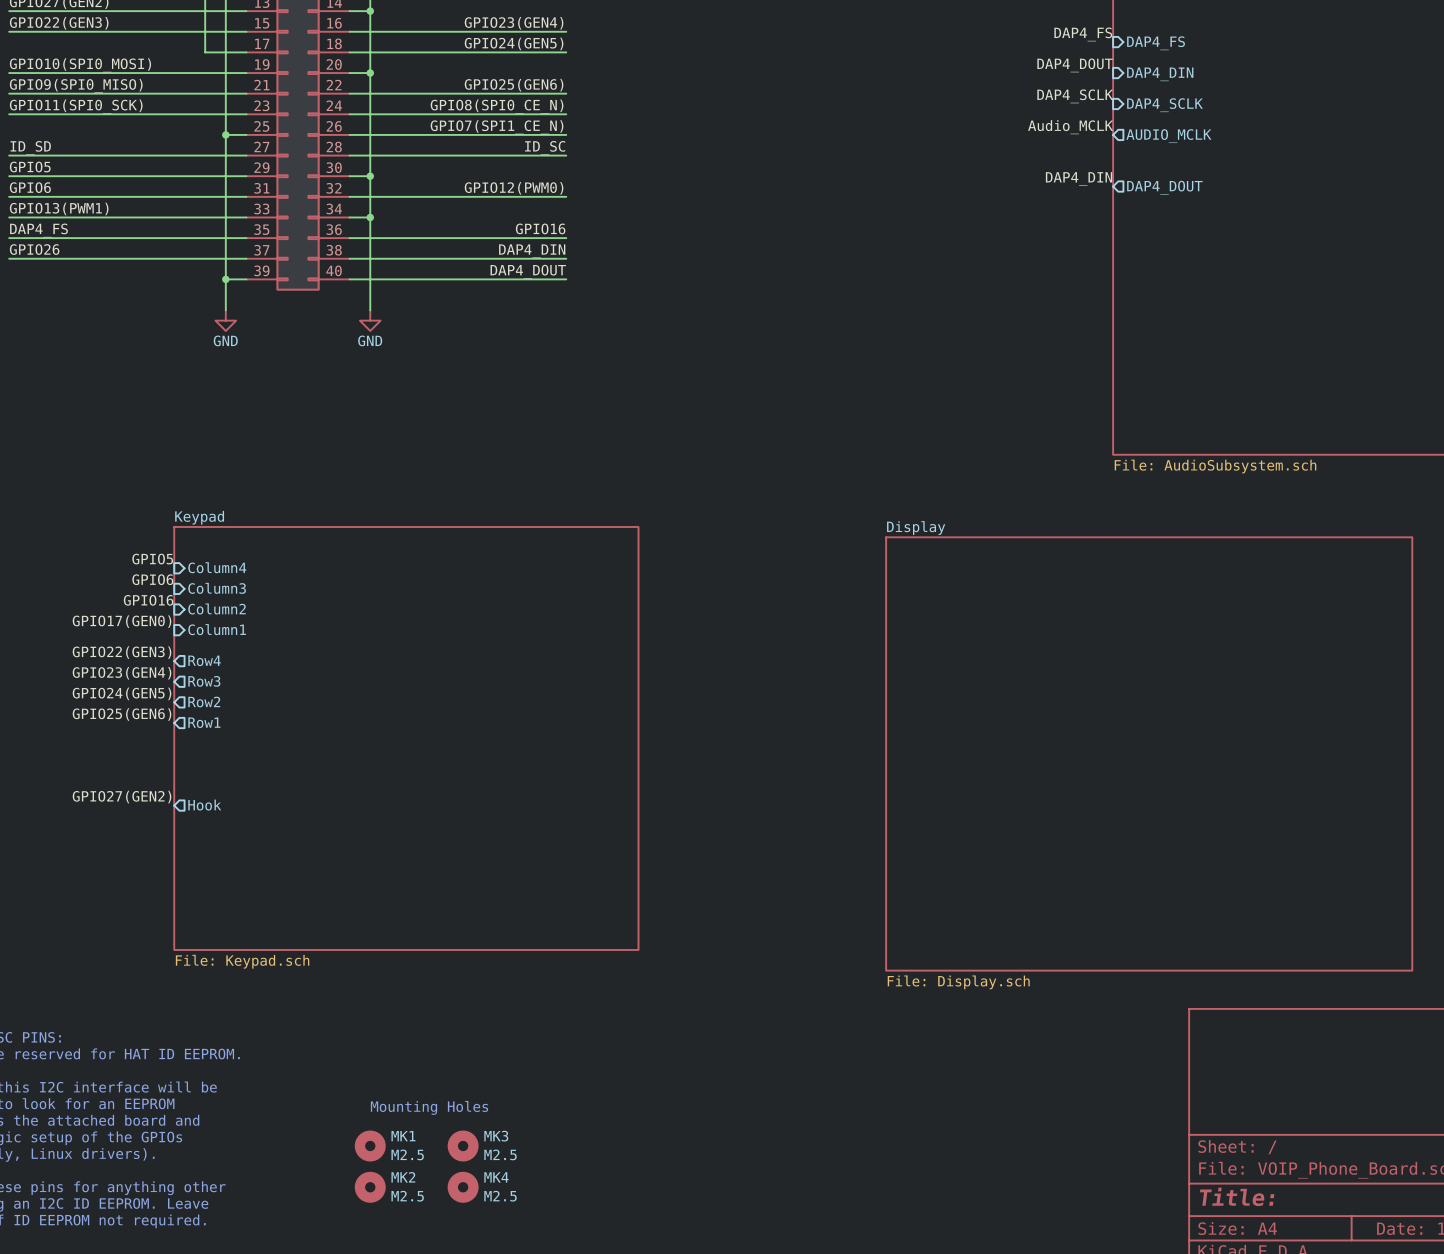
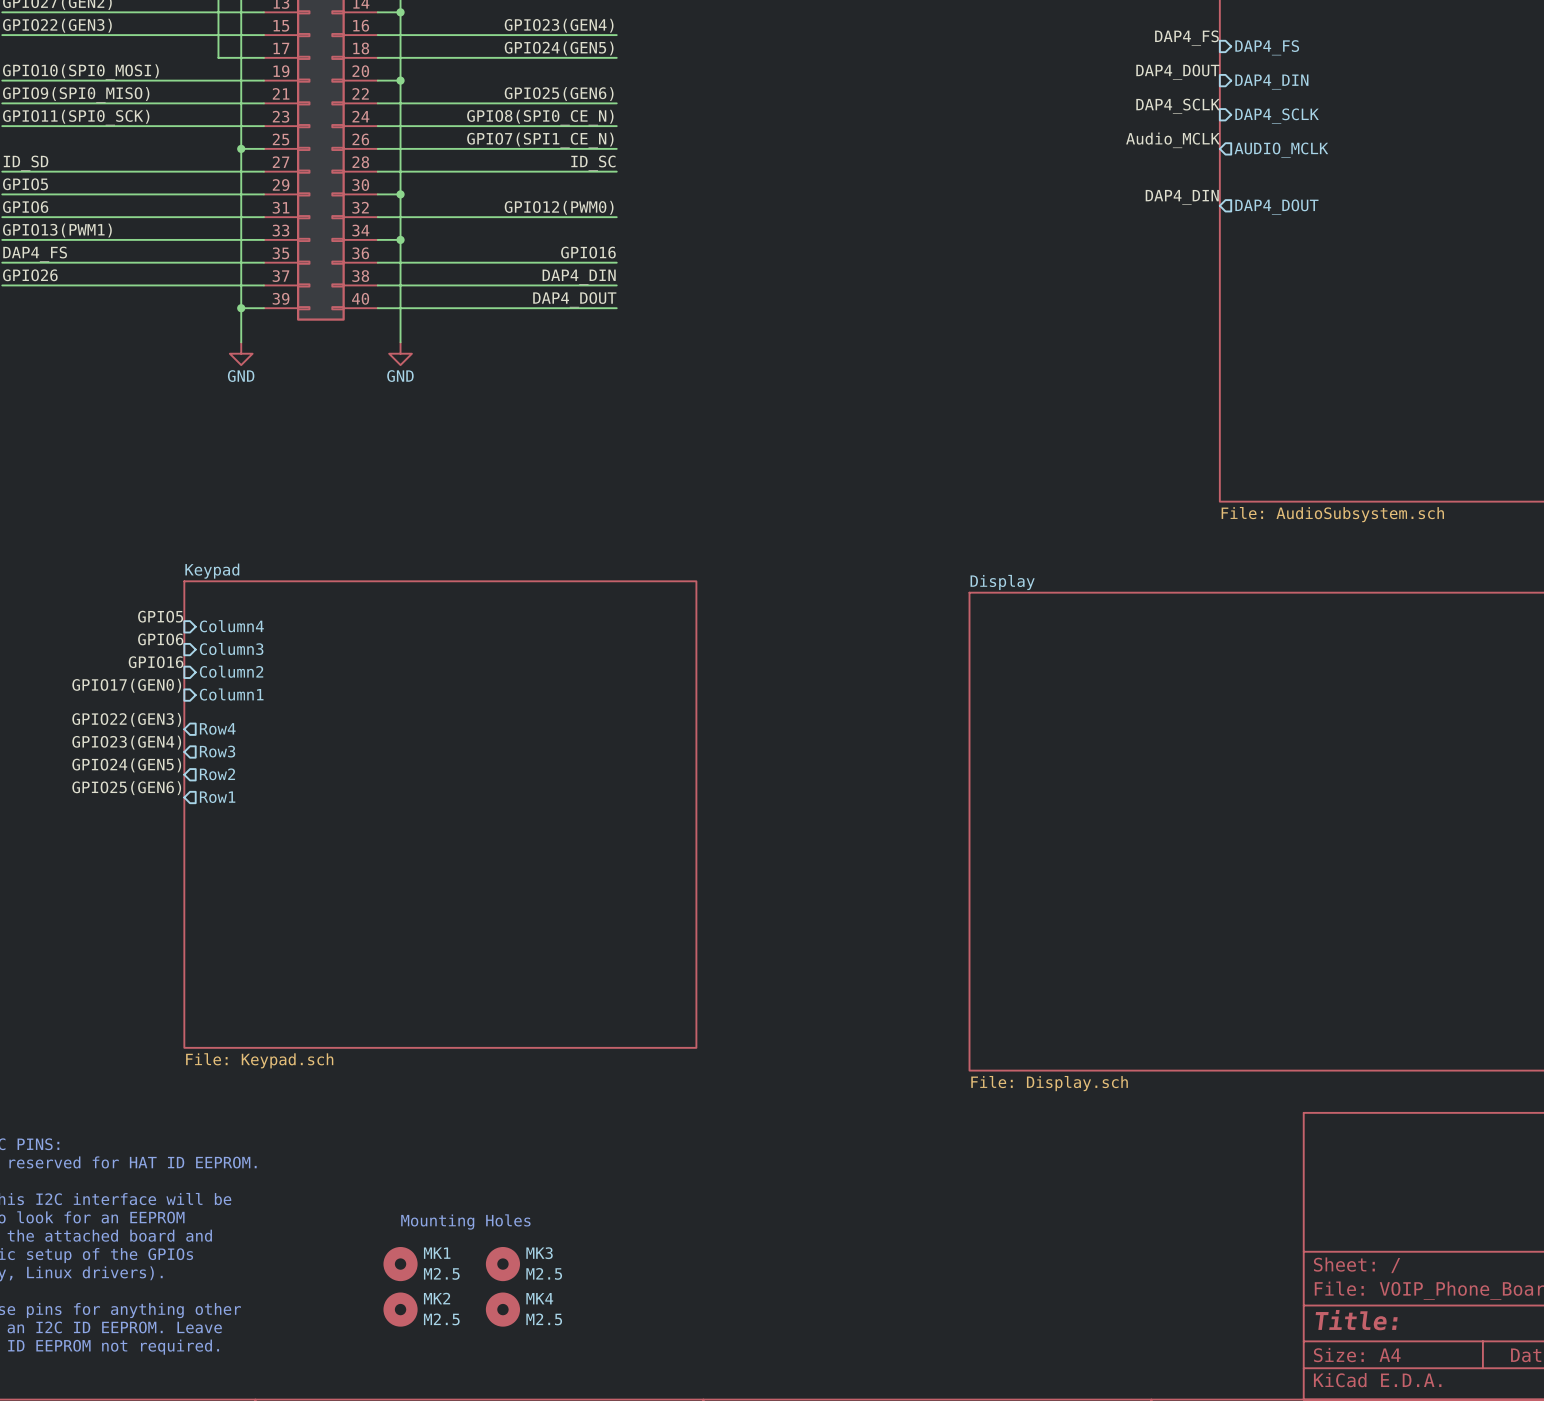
label: GPIO27(GEN2) (122, 797) -> none
sheet pin: Hook (204, 805) -> none

